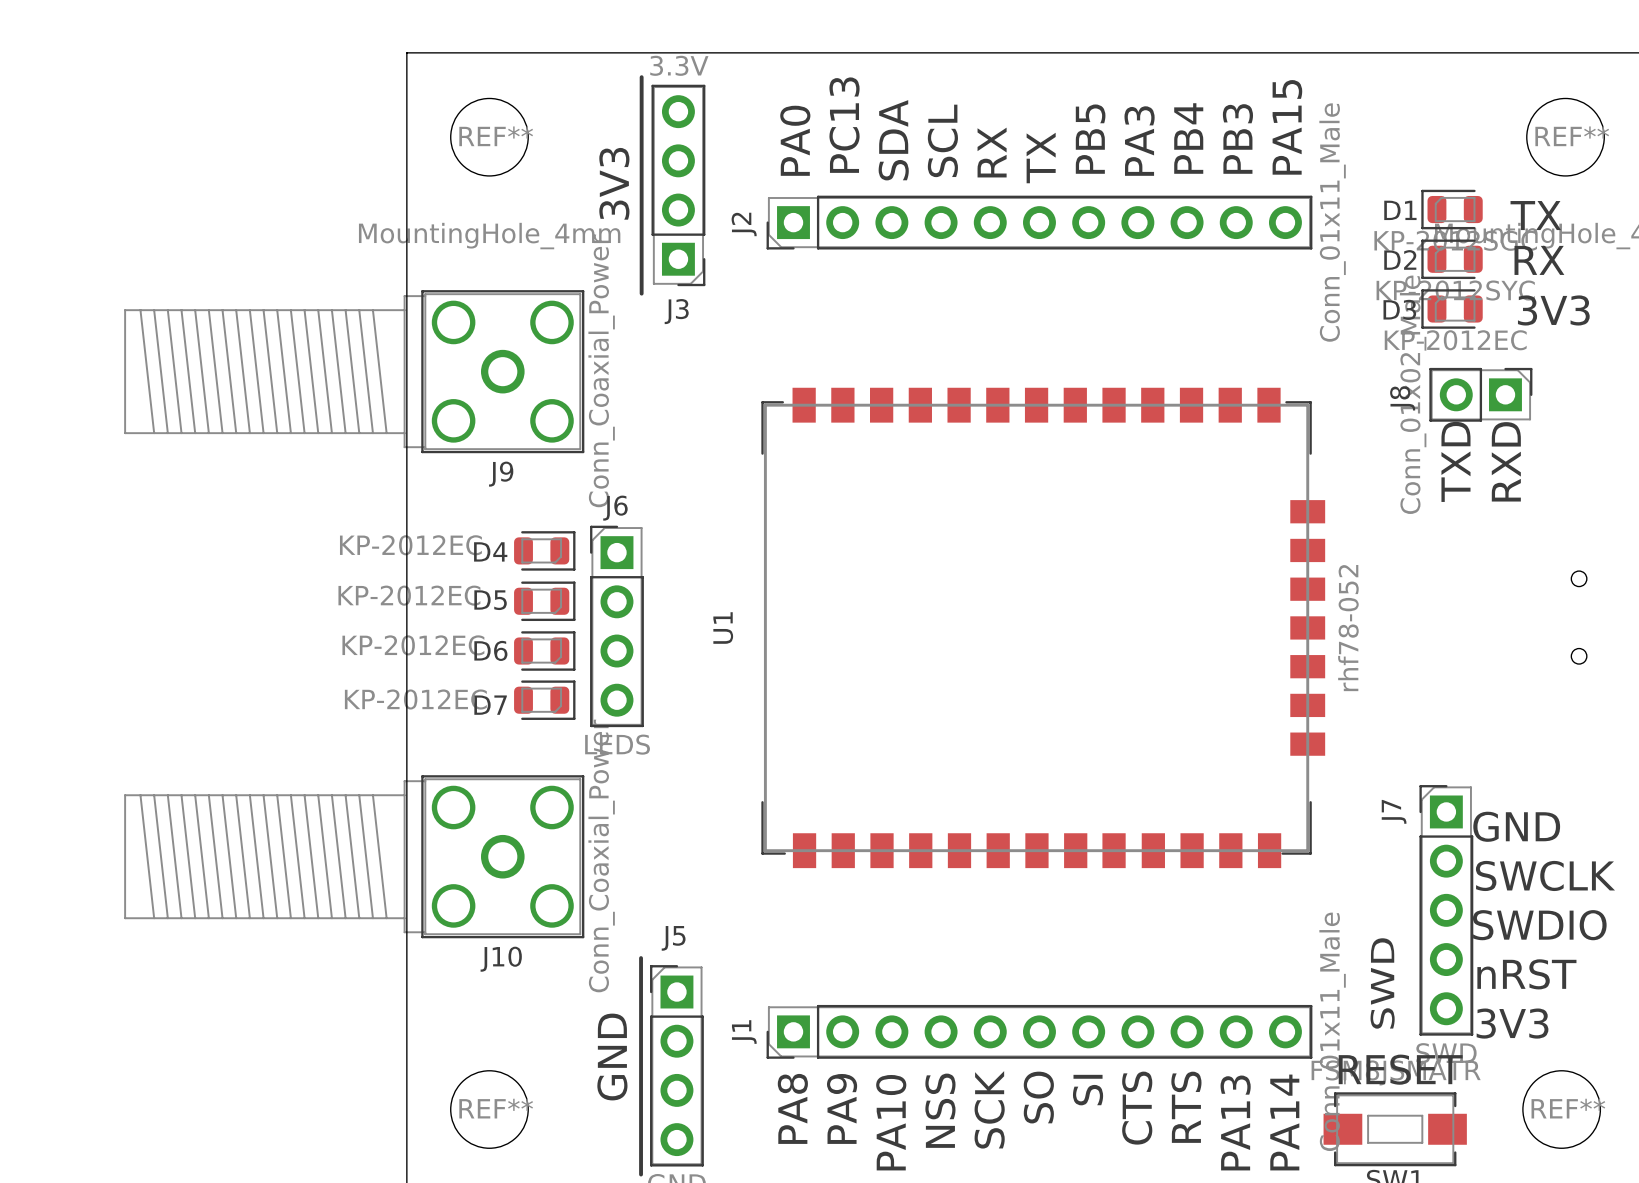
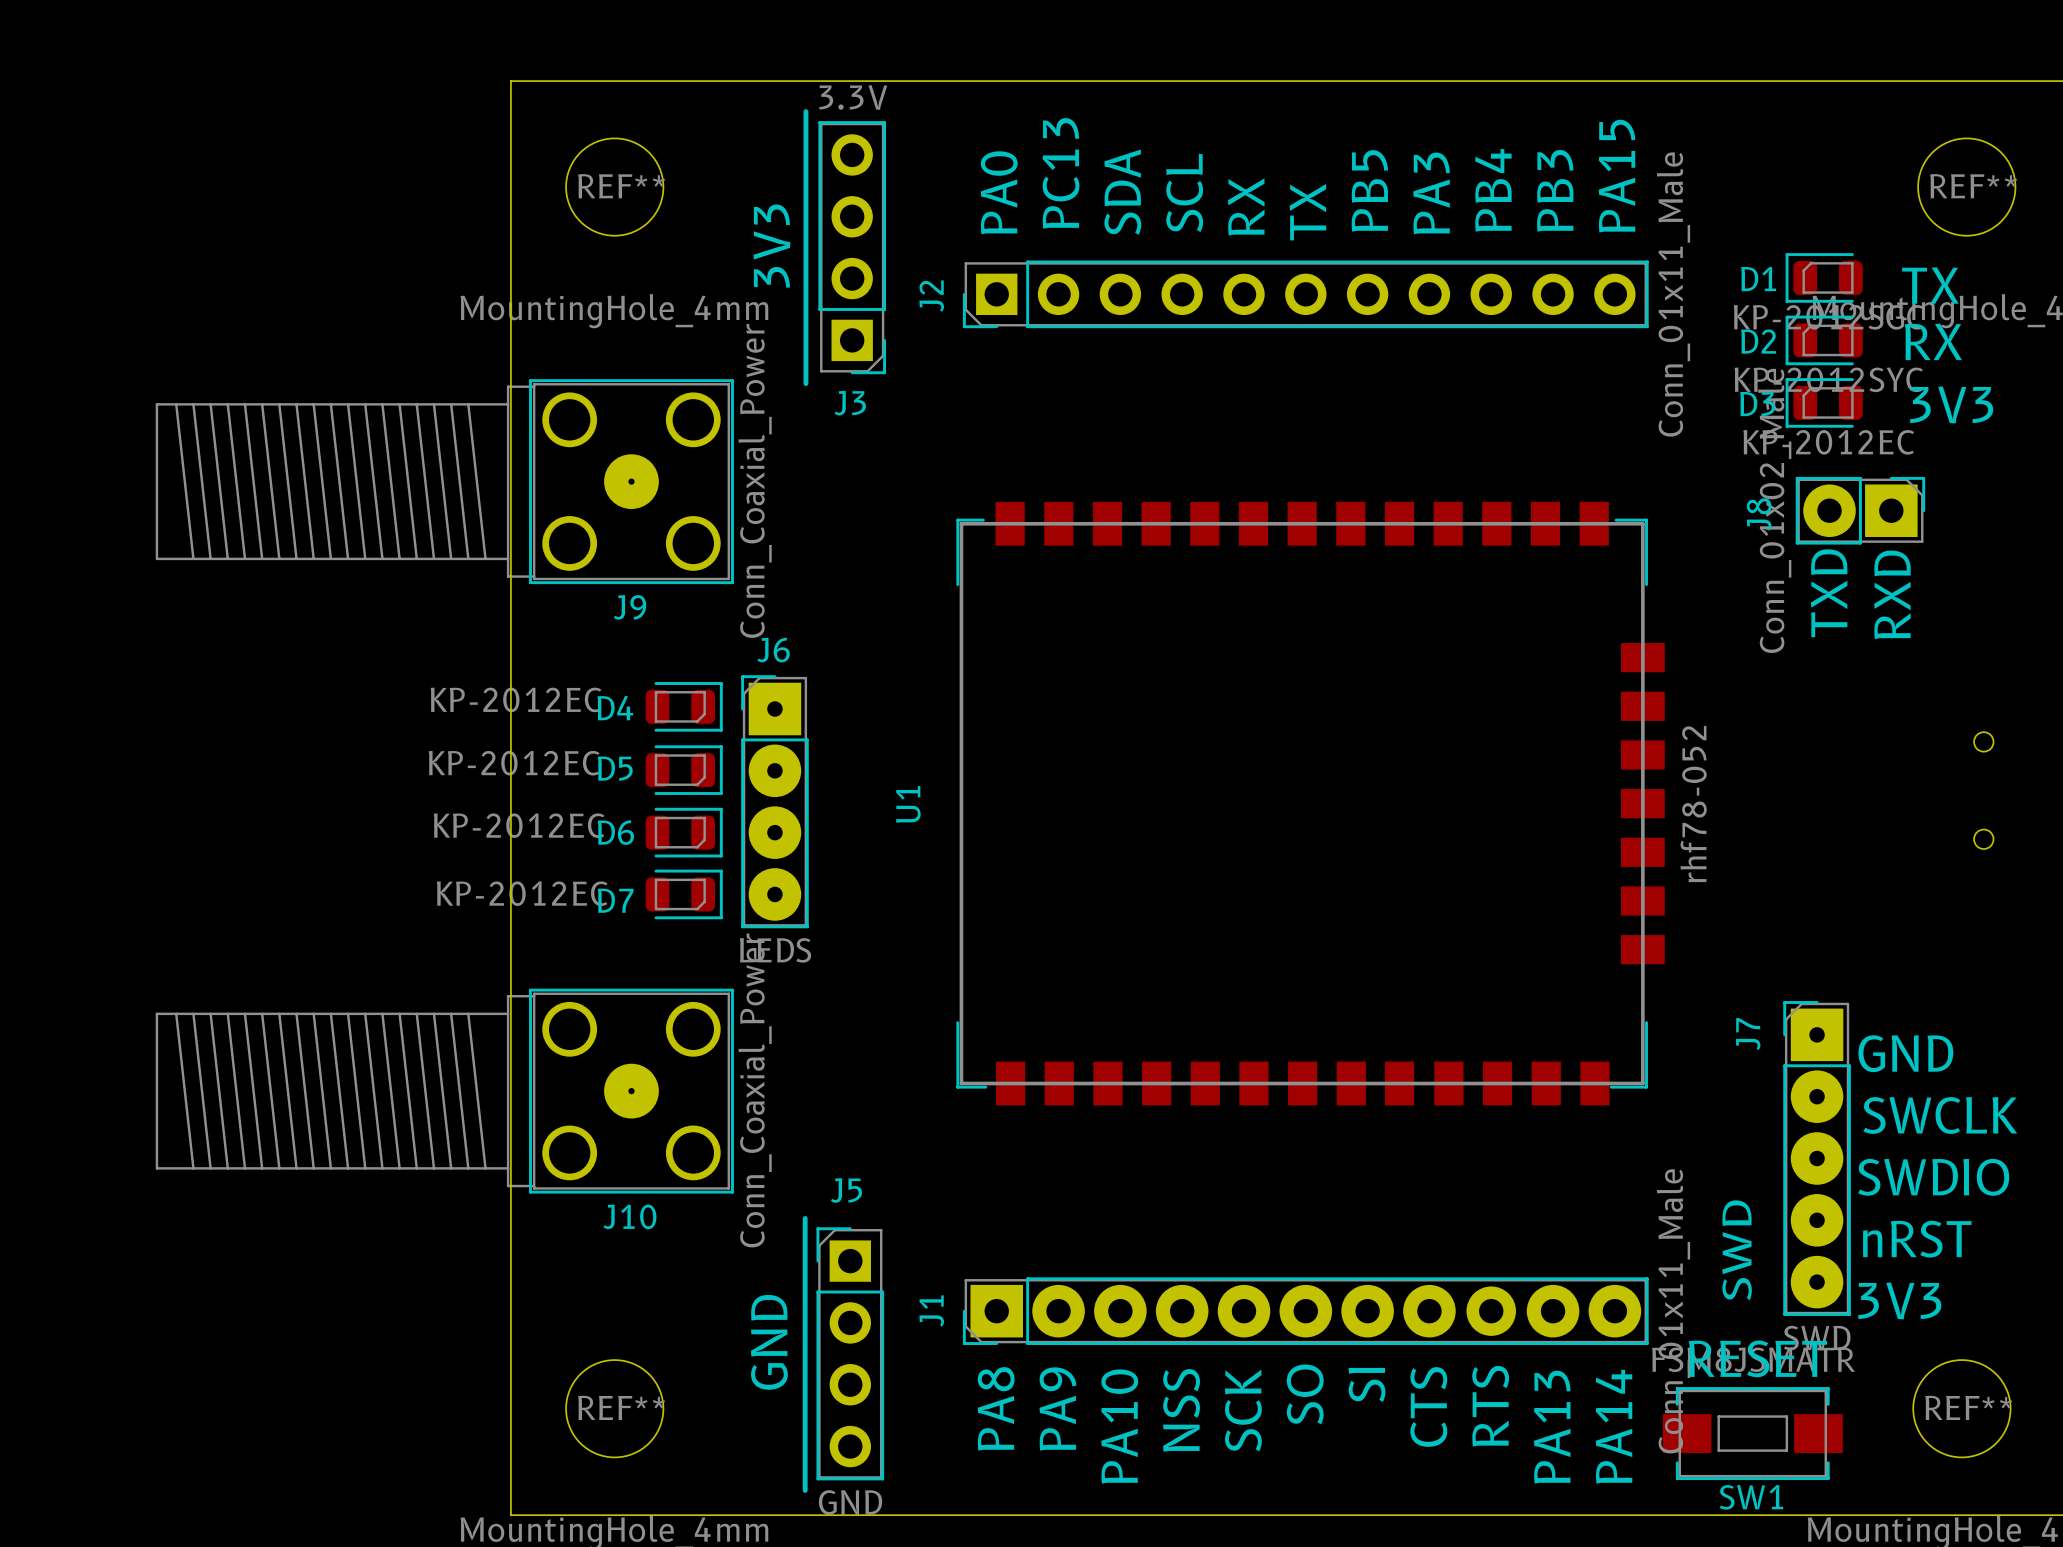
J9 footprint: [124, 290, 585, 454] -> [155, 379, 734, 585]
J8 footprint: [1429, 367, 1533, 422] -> [1795, 476, 1926, 545]
J6 footprint: [590, 525, 644, 728] -> [741, 675, 809, 929]
J10 footprint: [124, 775, 585, 939] -> [155, 988, 734, 1194]
J7 footprint: [1419, 785, 1474, 1036] -> [1783, 1001, 1851, 1316]
J1 footprint: [766, 1004, 1313, 1059] -> [962, 1277, 1649, 1346]

